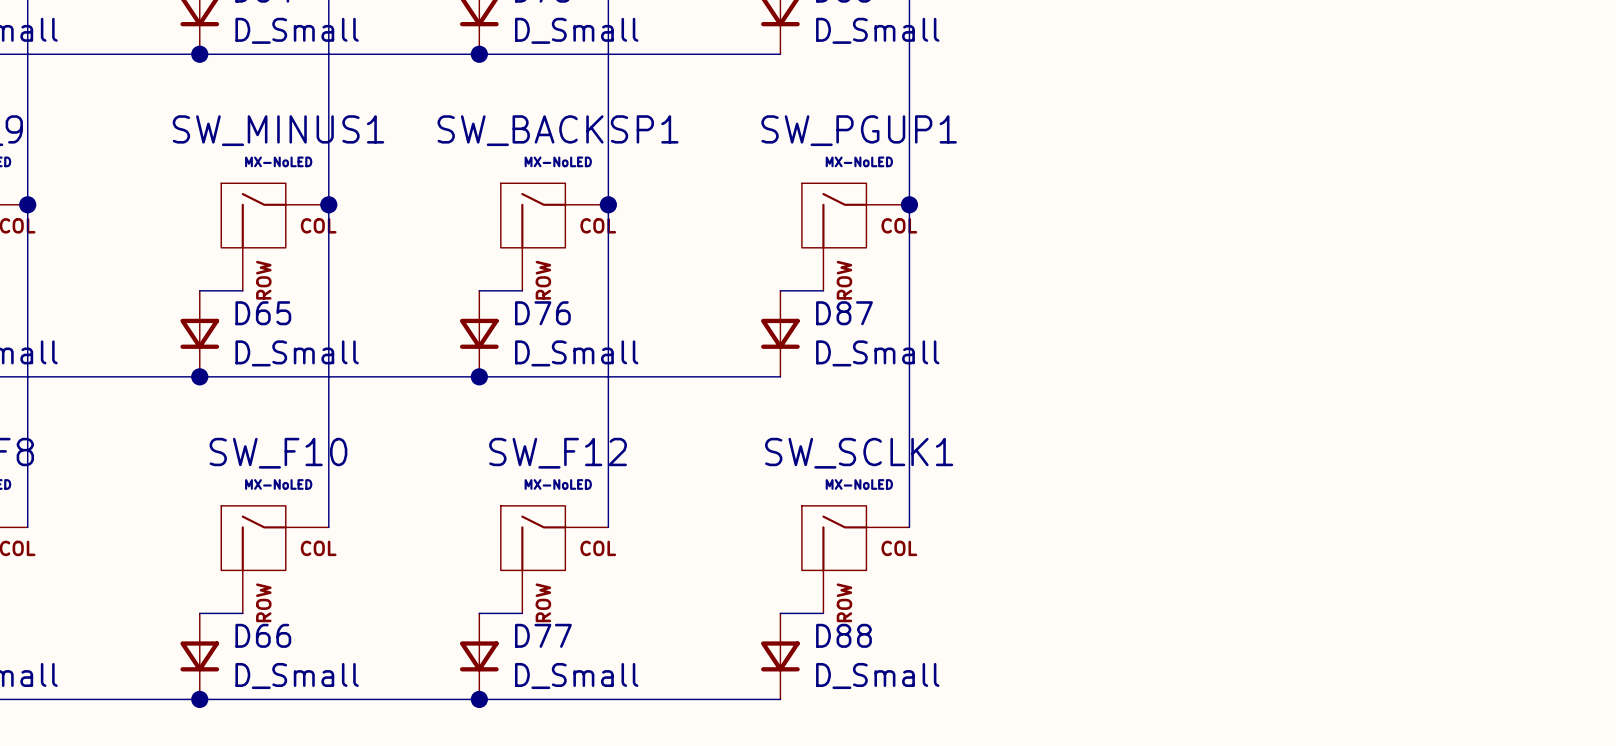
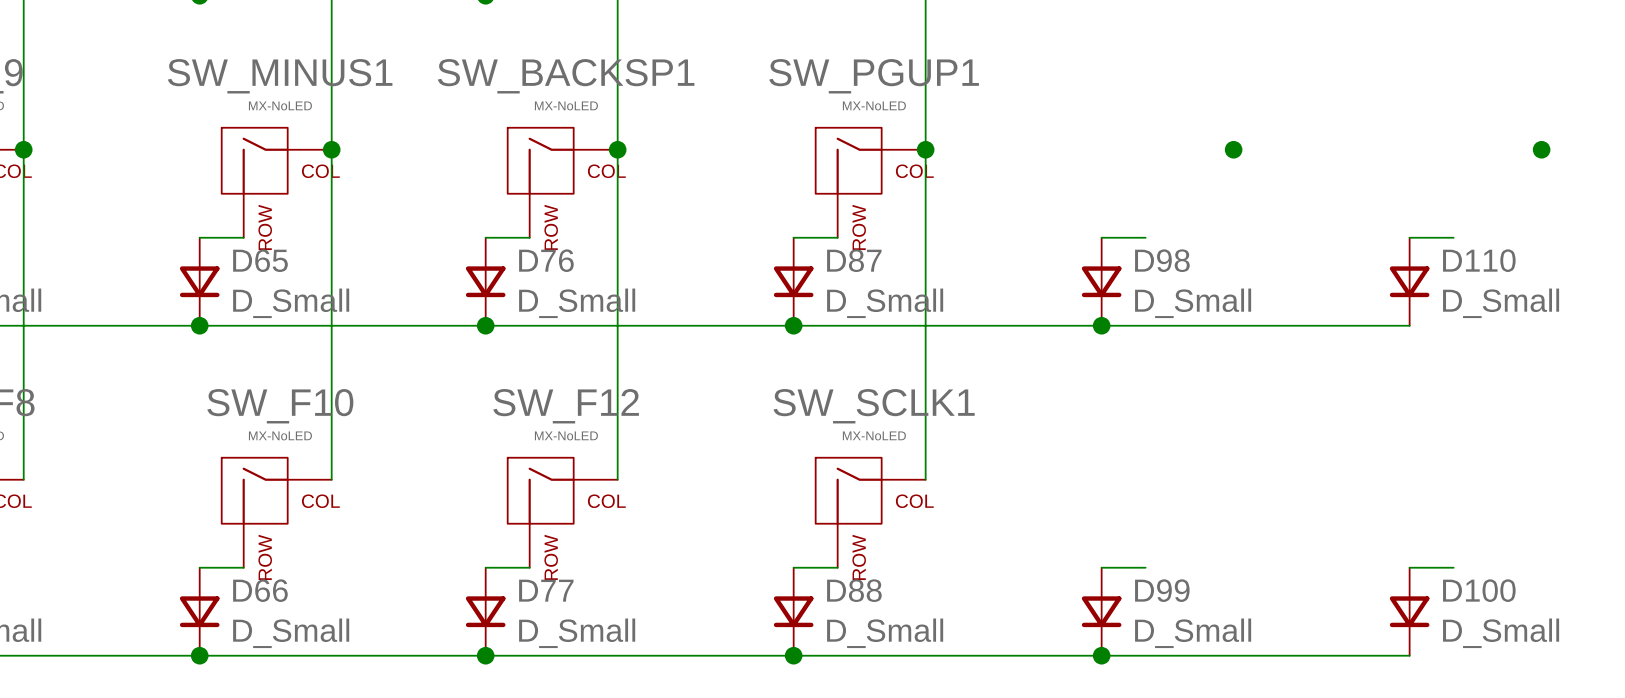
junction: none -> (1233, 149)
junction: none -> (1541, 149)
wire: none -> (1101, 237) (1145, 237)
wire: none -> (1409, 237) (1453, 237)
D98: none -> D_Small (1101, 281)
D110: none -> D_Small (1409, 281)
wire: none -> (793, 325) (1409, 325)
junction: none -> (793, 325)
junction: none -> (1101, 325)
wire: none -> (1101, 567) (1145, 567)
wire: none -> (1409, 567) (1453, 567)
D99: none -> D_Small (1101, 611)
D100: none -> D_Small (1409, 611)
wire: none -> (793, 655) (1409, 655)
junction: none -> (793, 655)
junction: none -> (1101, 655)

